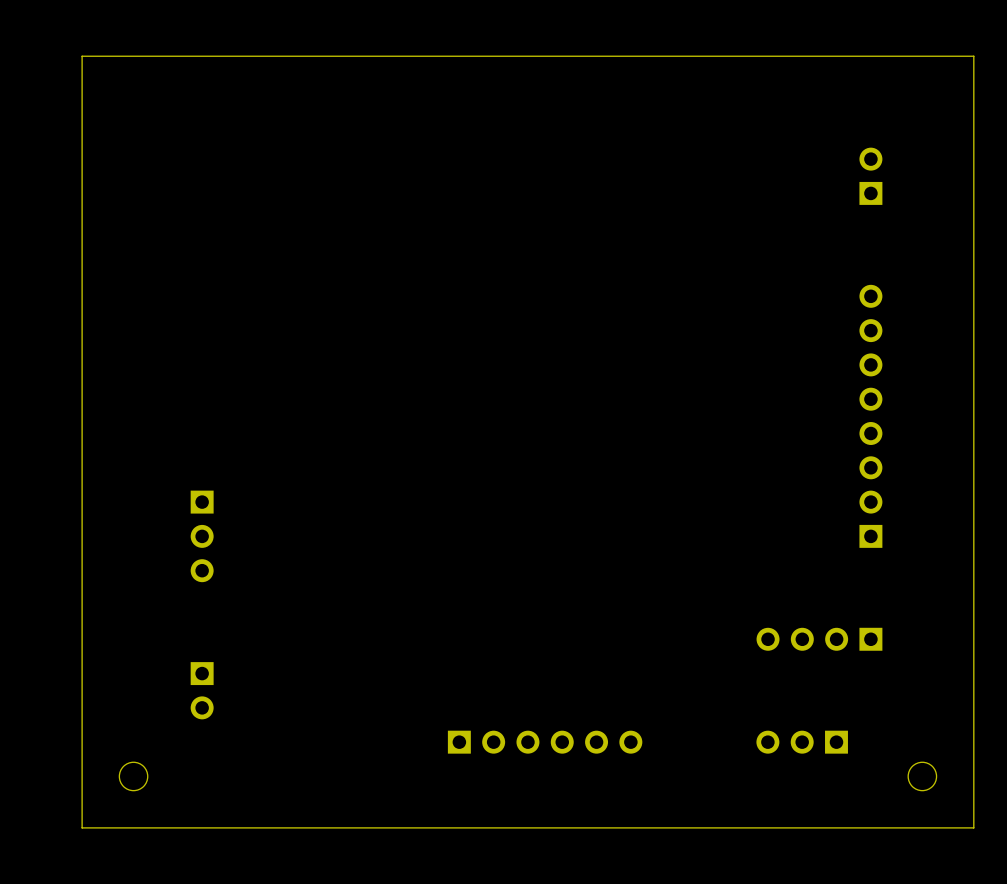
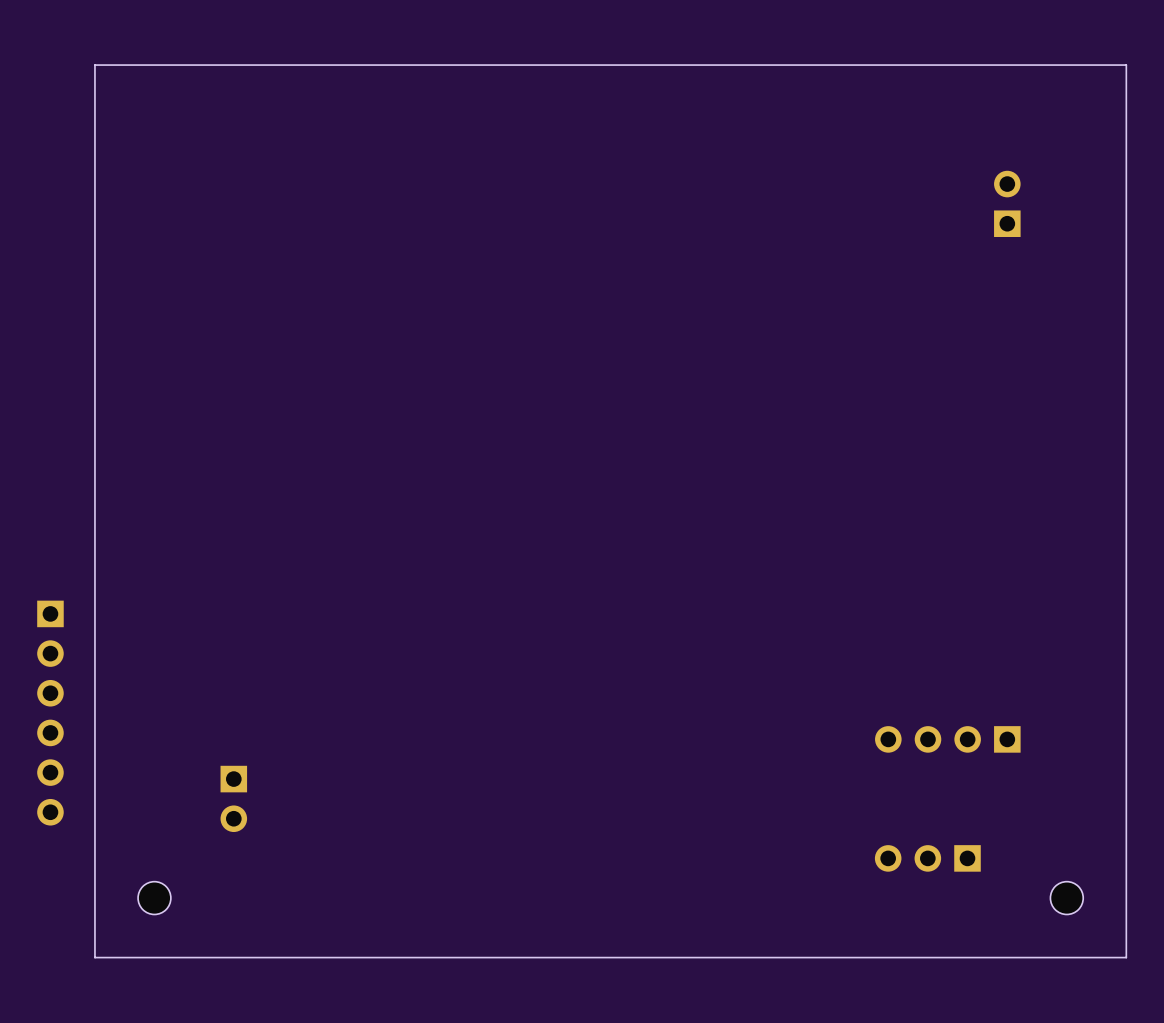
part: (870, 416) -> none
part: (202, 536) -> none
part: none -> (50, 713)
part: (545, 742) -> none

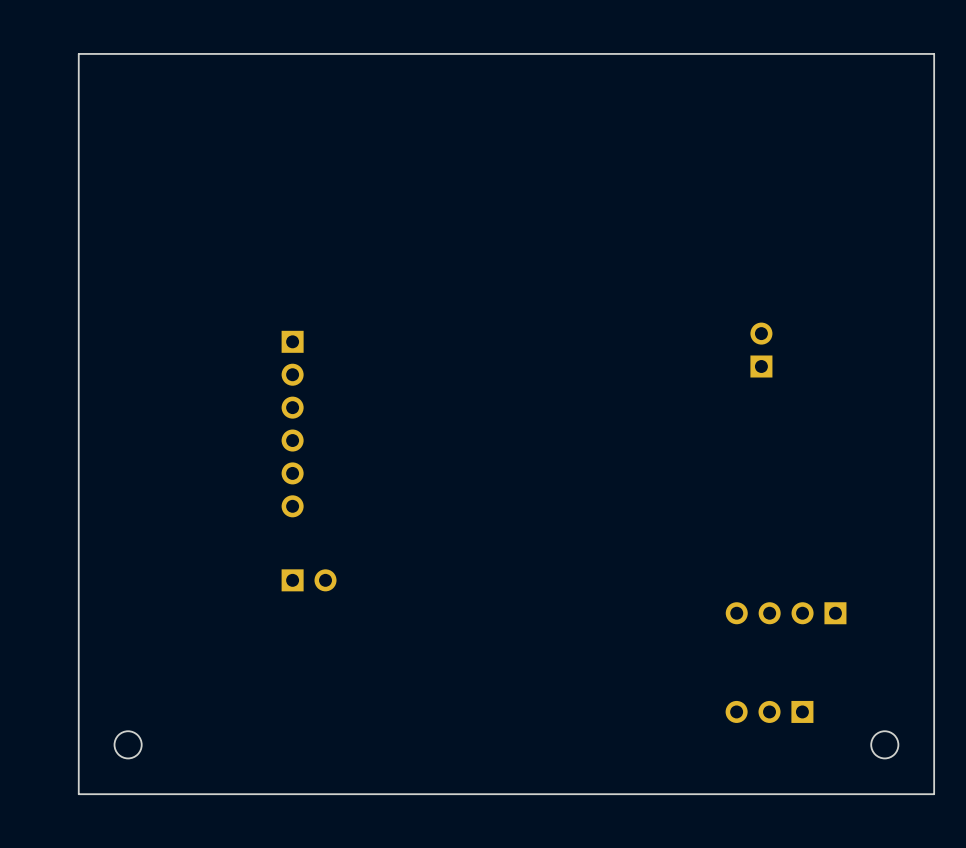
part position: (1007, 203) -> (761, 350)
part position: (50, 713) -> (292, 424)
part rotation: 0° (233, 798) -> 90° counterclockwise (309, 580)
part position: (233, 798) -> (309, 580)

